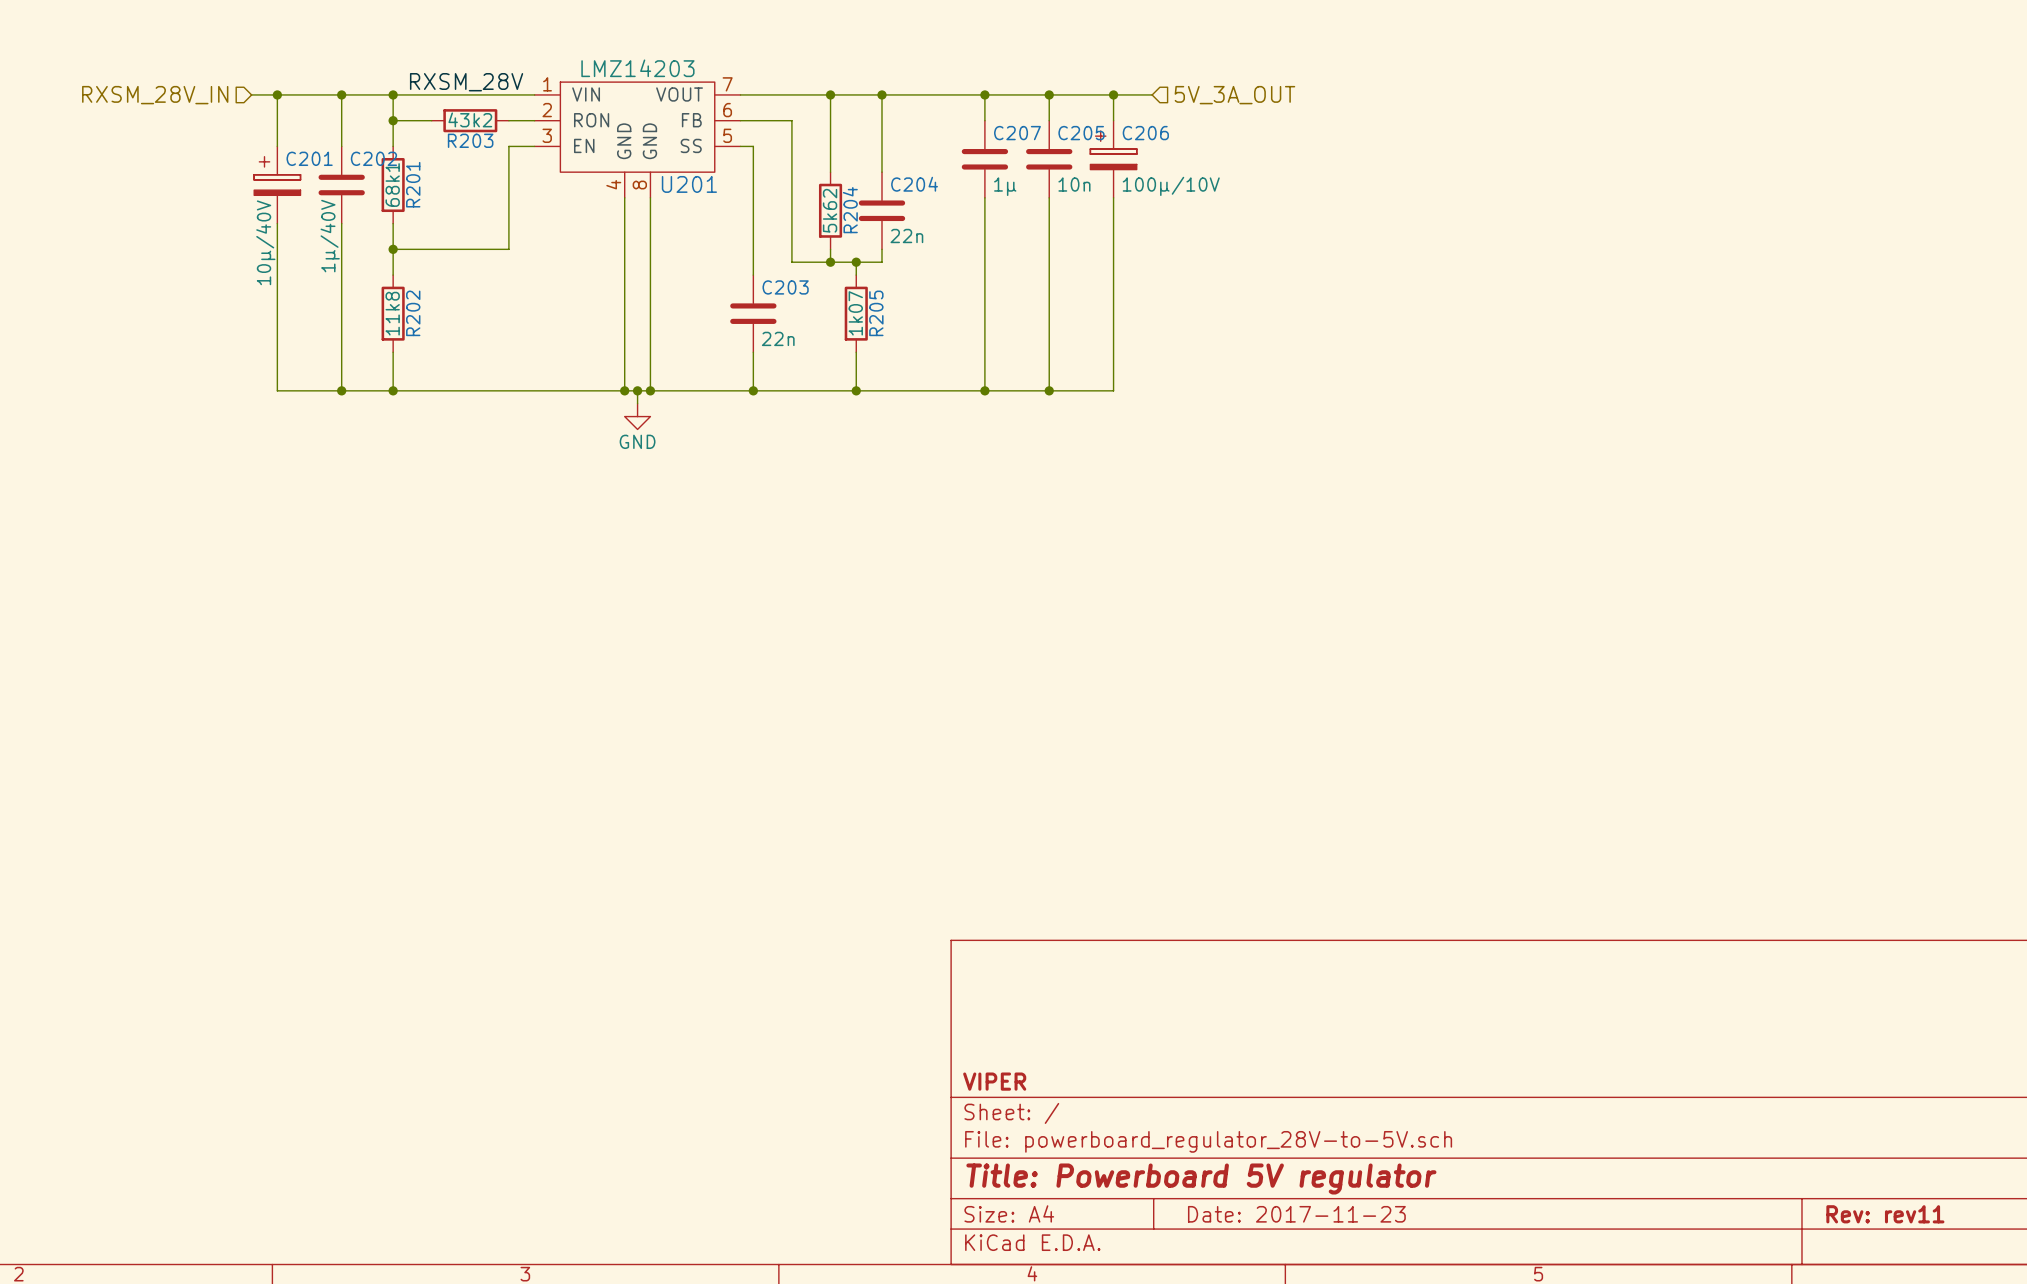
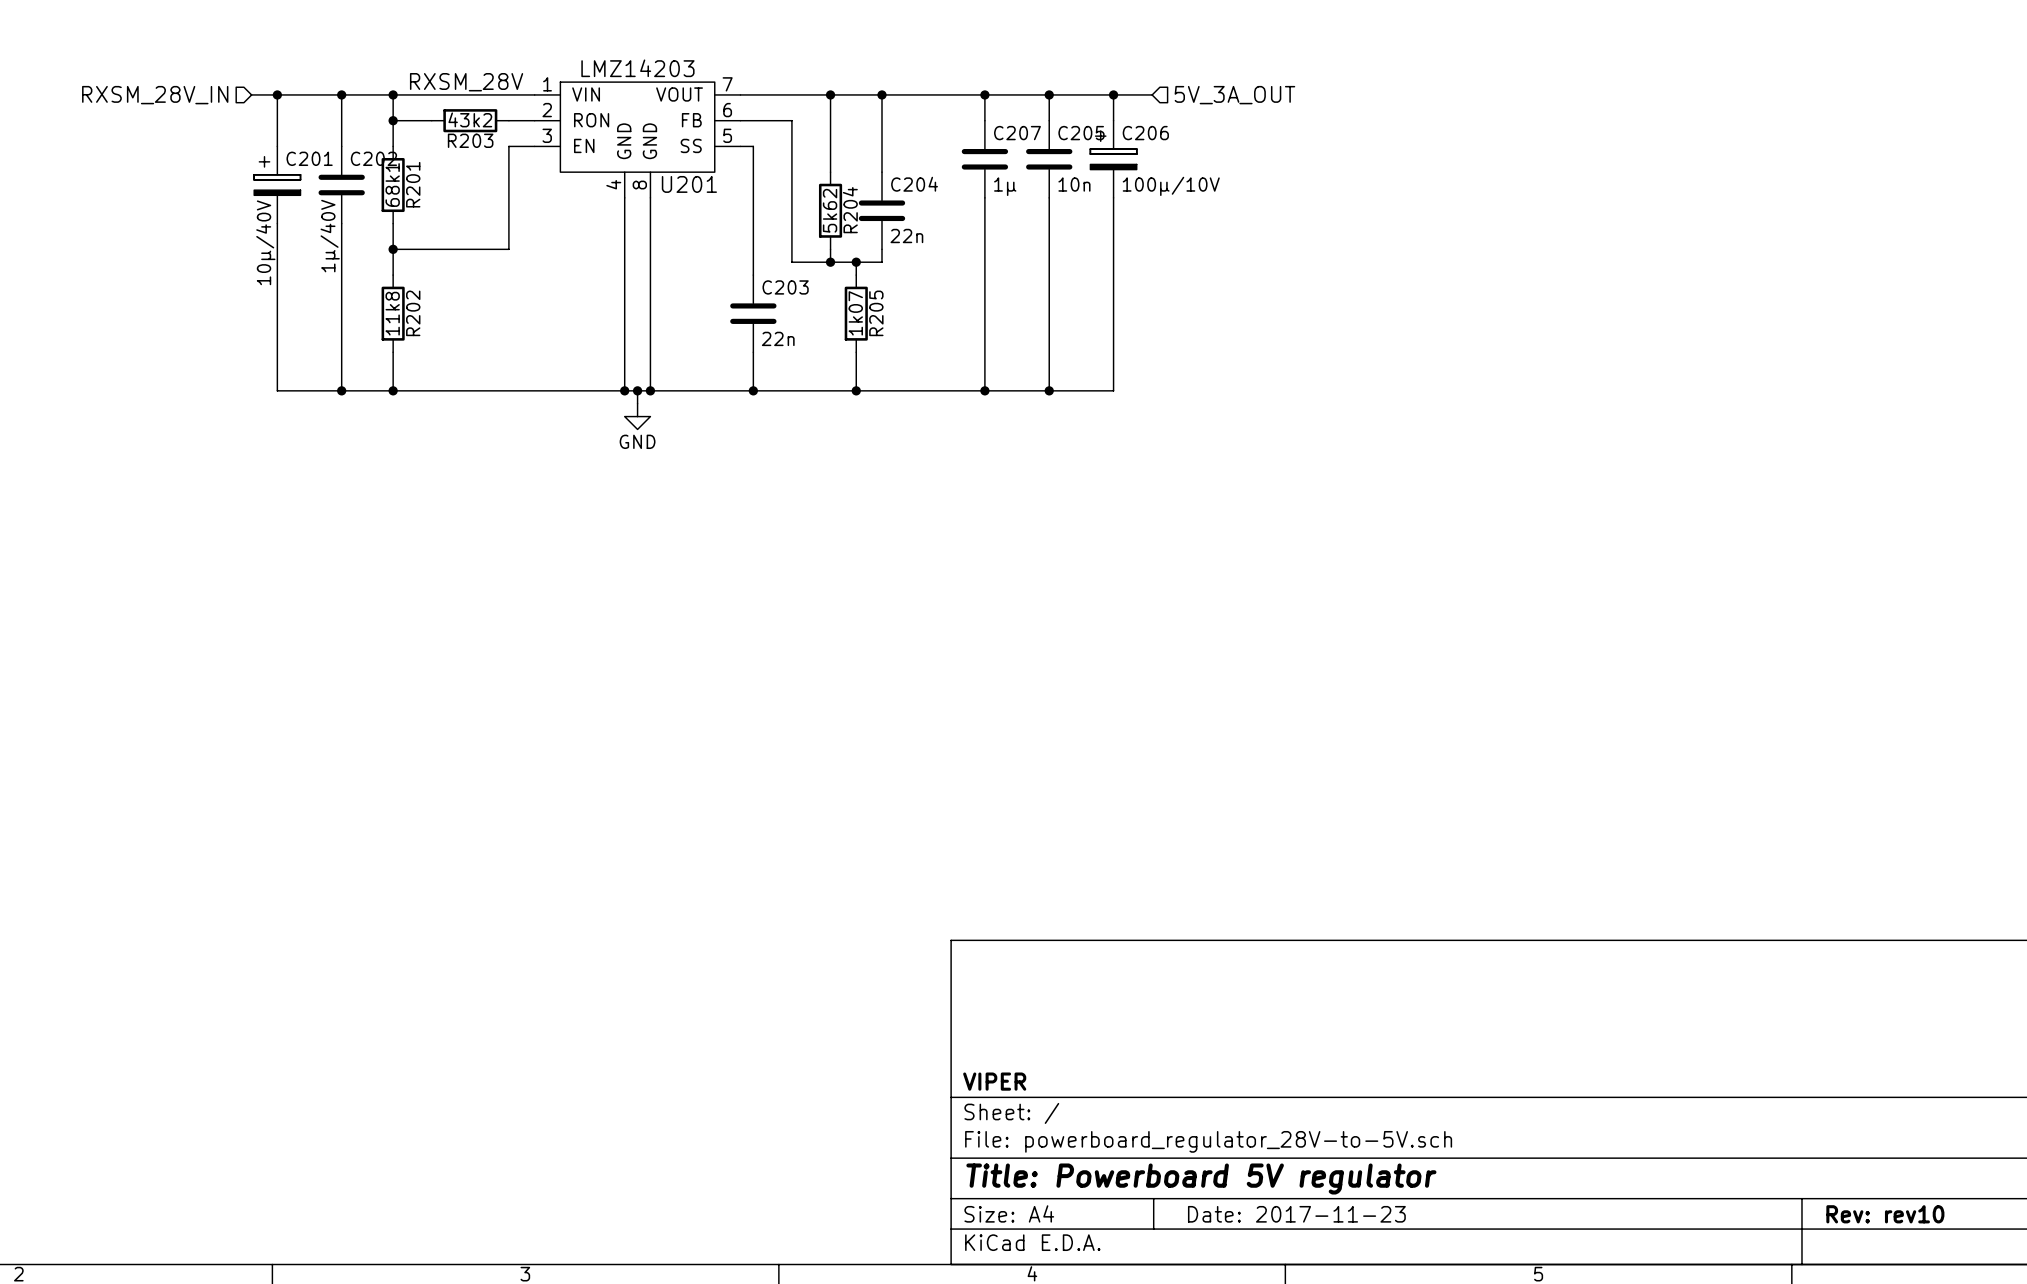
title block: Rev: rev11 (1885, 1214) -> Rev: rev10 (1885, 1214)

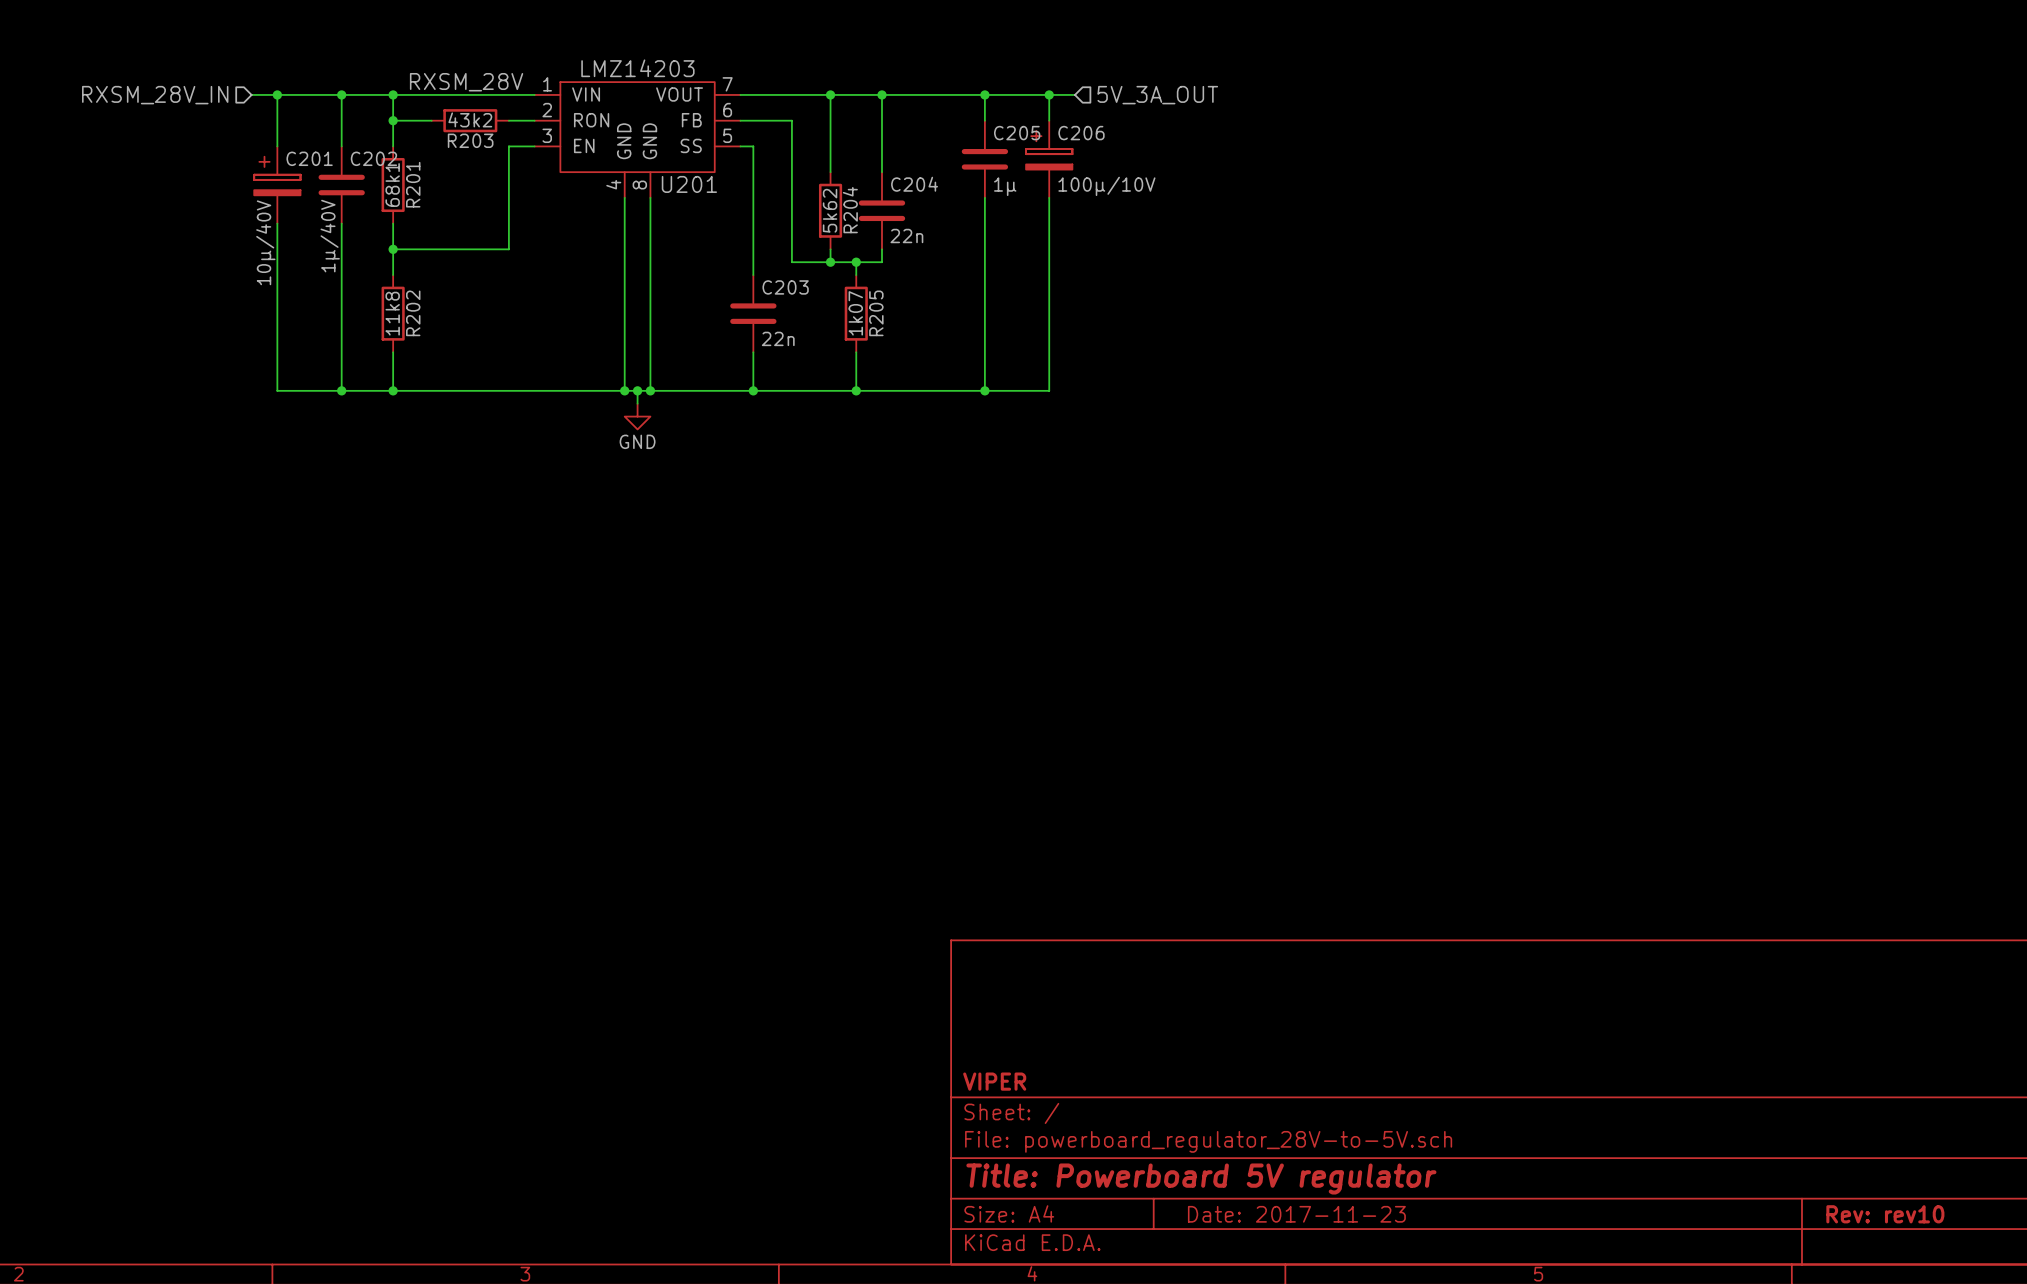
wire: (1074, 94) (1152, 94) -> none
wire: (1113, 94) (1113, 120) -> none
junction: (1113, 94) -> none
hierarchical label position: 5V_3A_OUT (1234, 95) -> 5V_3A_OUT (1157, 95)
C207 name: C207 (1017, 133) -> C205 (1017, 133)
C205: 10n (1049, 159) -> none
C206 position: (1113, 159) -> (1049, 159)
wire: (1113, 197) (1113, 390) (1049, 390) -> none
junction: (1049, 390) -> none

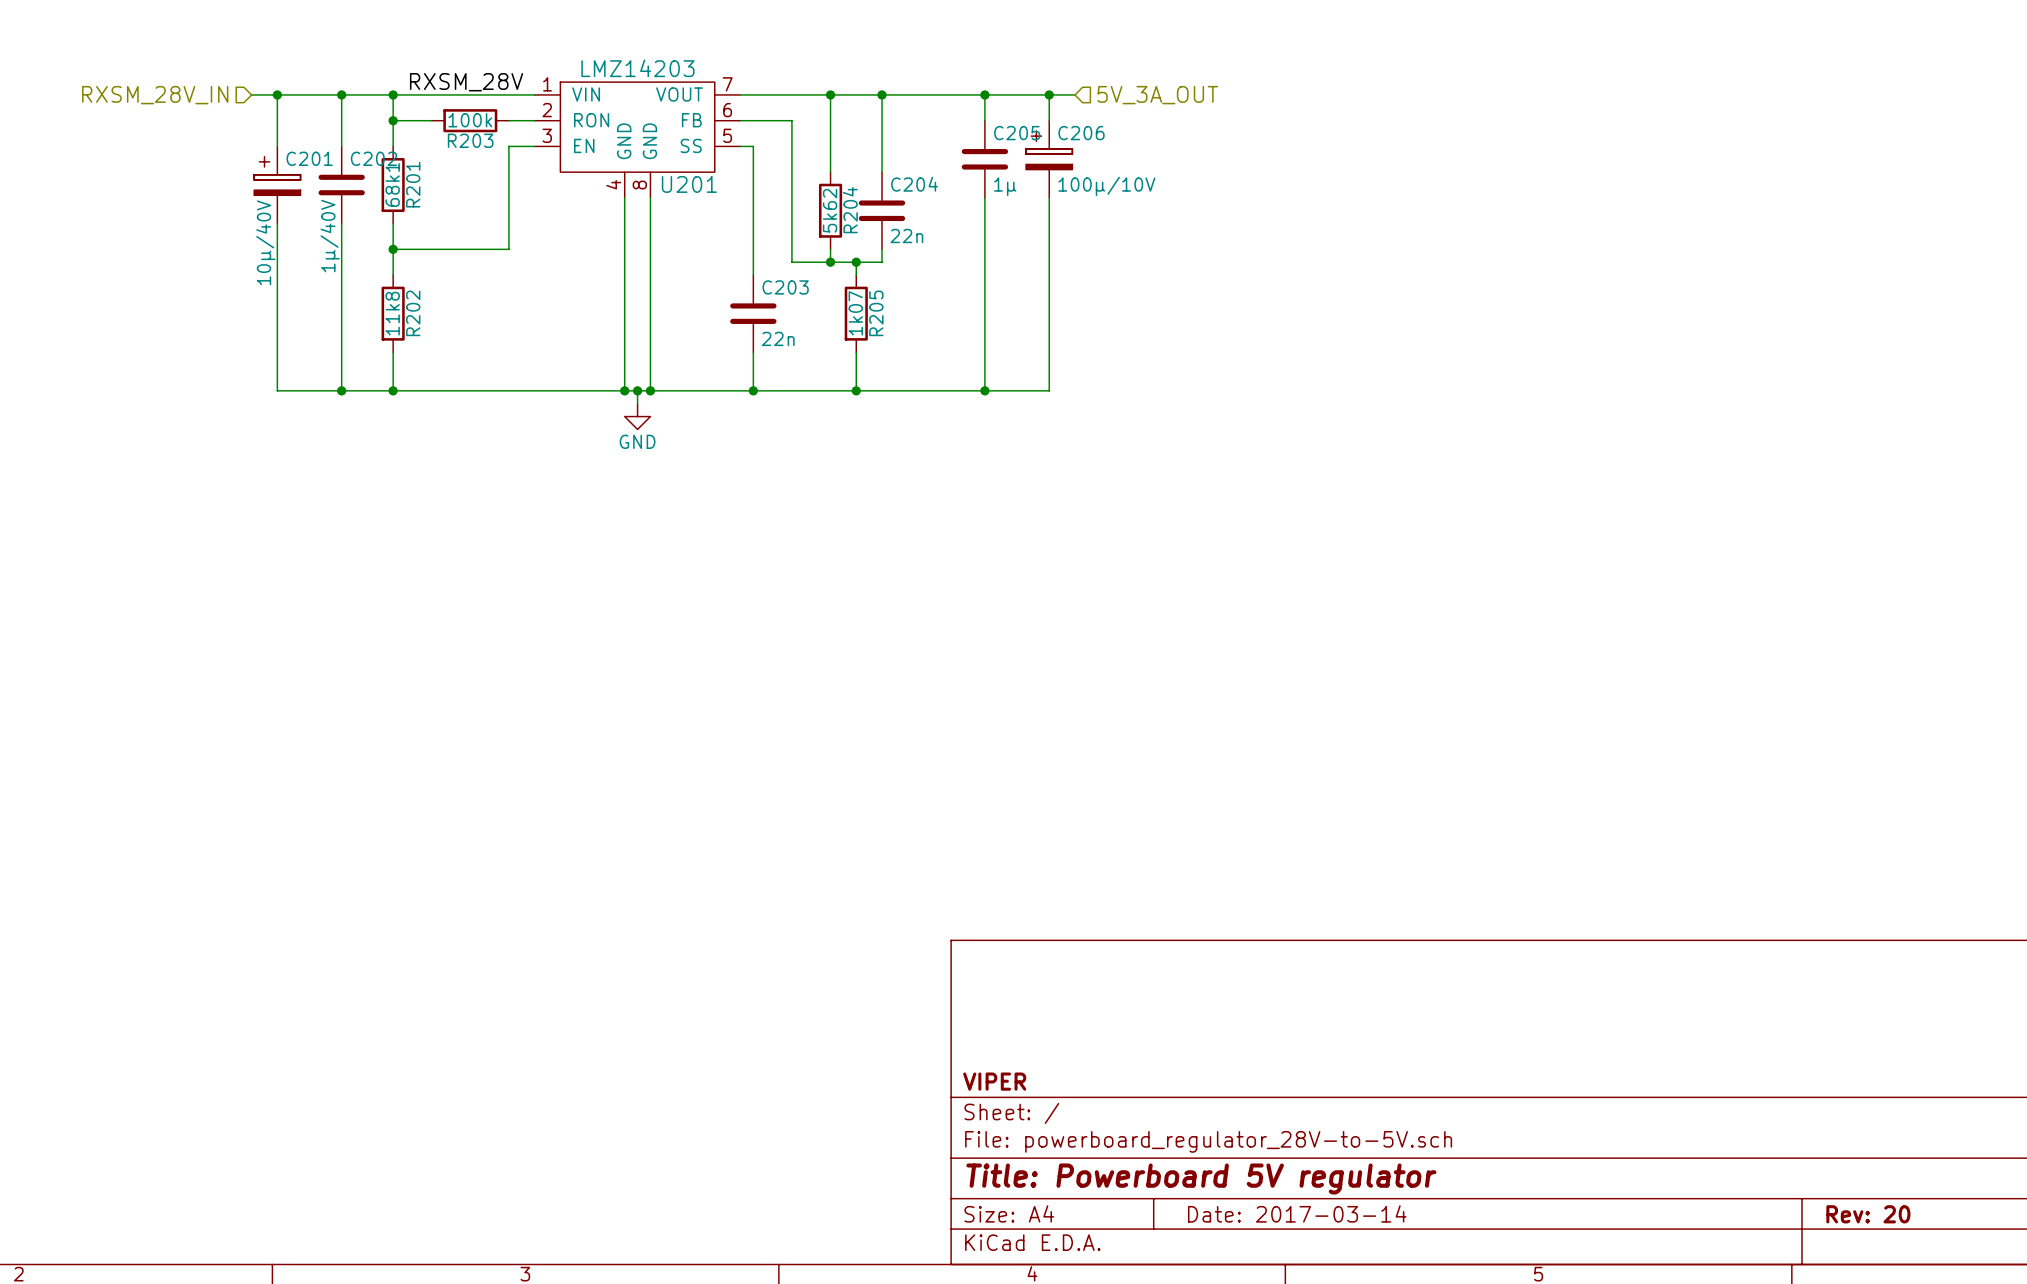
R203 value: 43k2 (470, 119) -> 100k (470, 120)
title block: Date: 2017-11-23 (1296, 1214) -> Date: 2017-03-14 (1297, 1213)
title block: Rev: rev10 (1885, 1214) -> Rev: 20 (1868, 1214)

